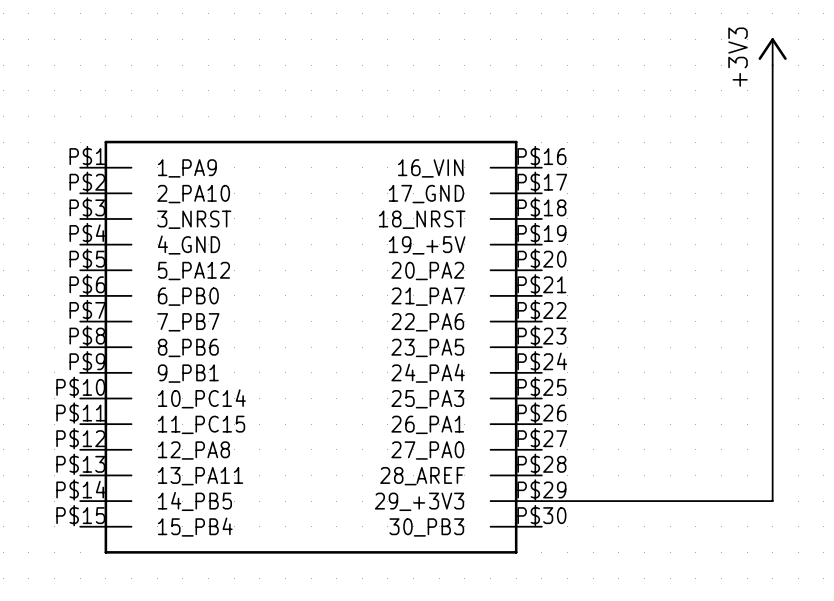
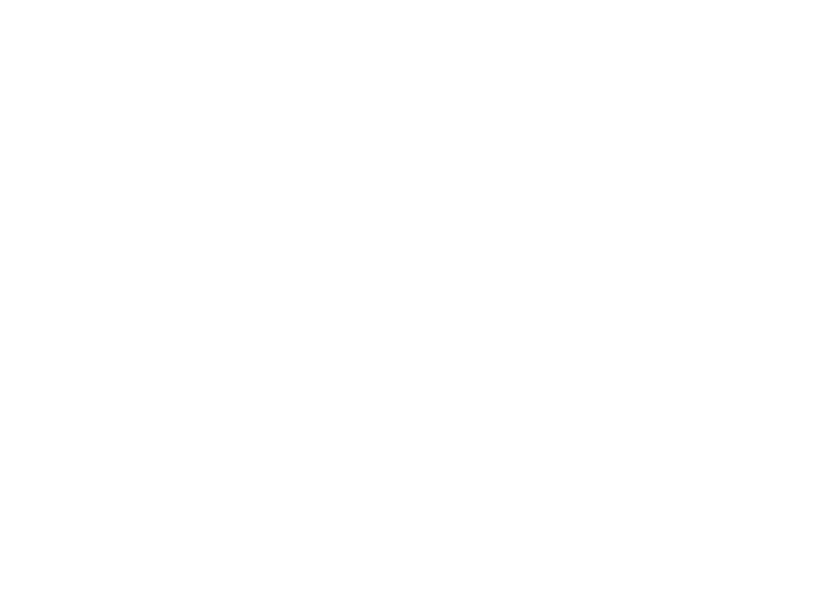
power symbol: +3V3 (772, 51) -> none
wire: (772, 65) (772, 501) (541, 501) -> none
part: (311, 347) -> none

